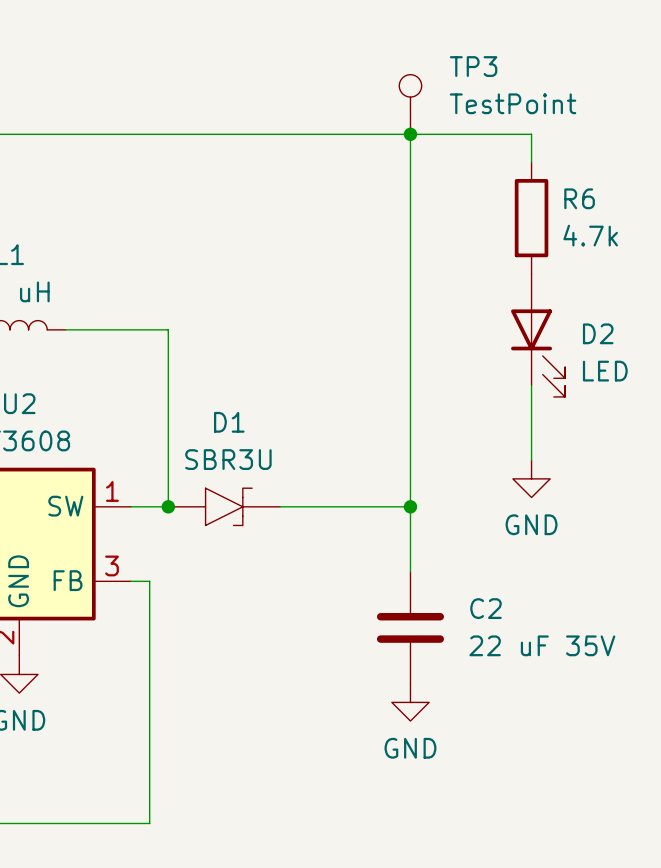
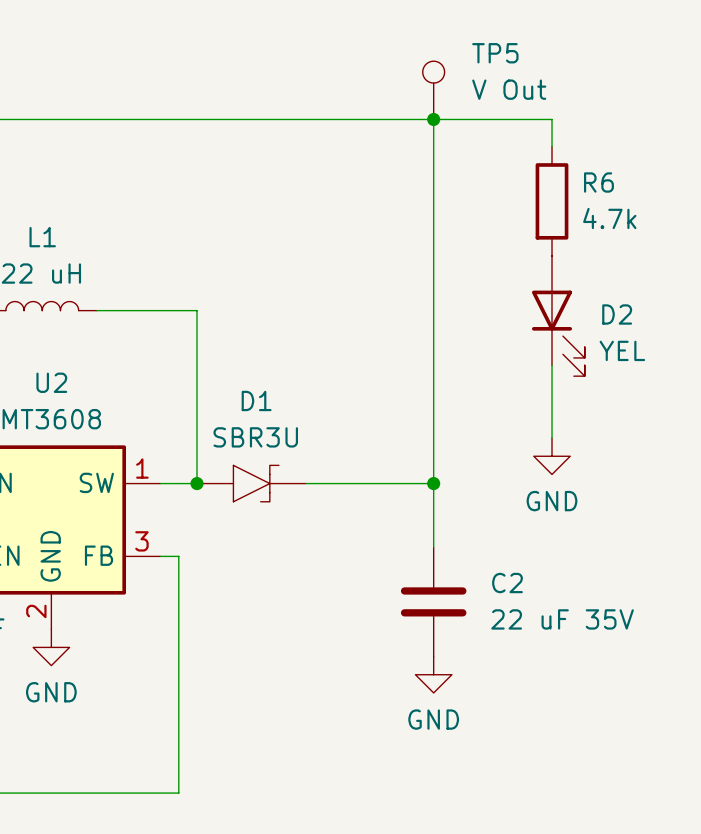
TP3 name: TP3 (473, 66) -> TP5 (495, 53)
TP3 value: TestPoint (513, 103) -> V Out (509, 89)
D2 value: LED (605, 371) -> YEL (622, 350)

